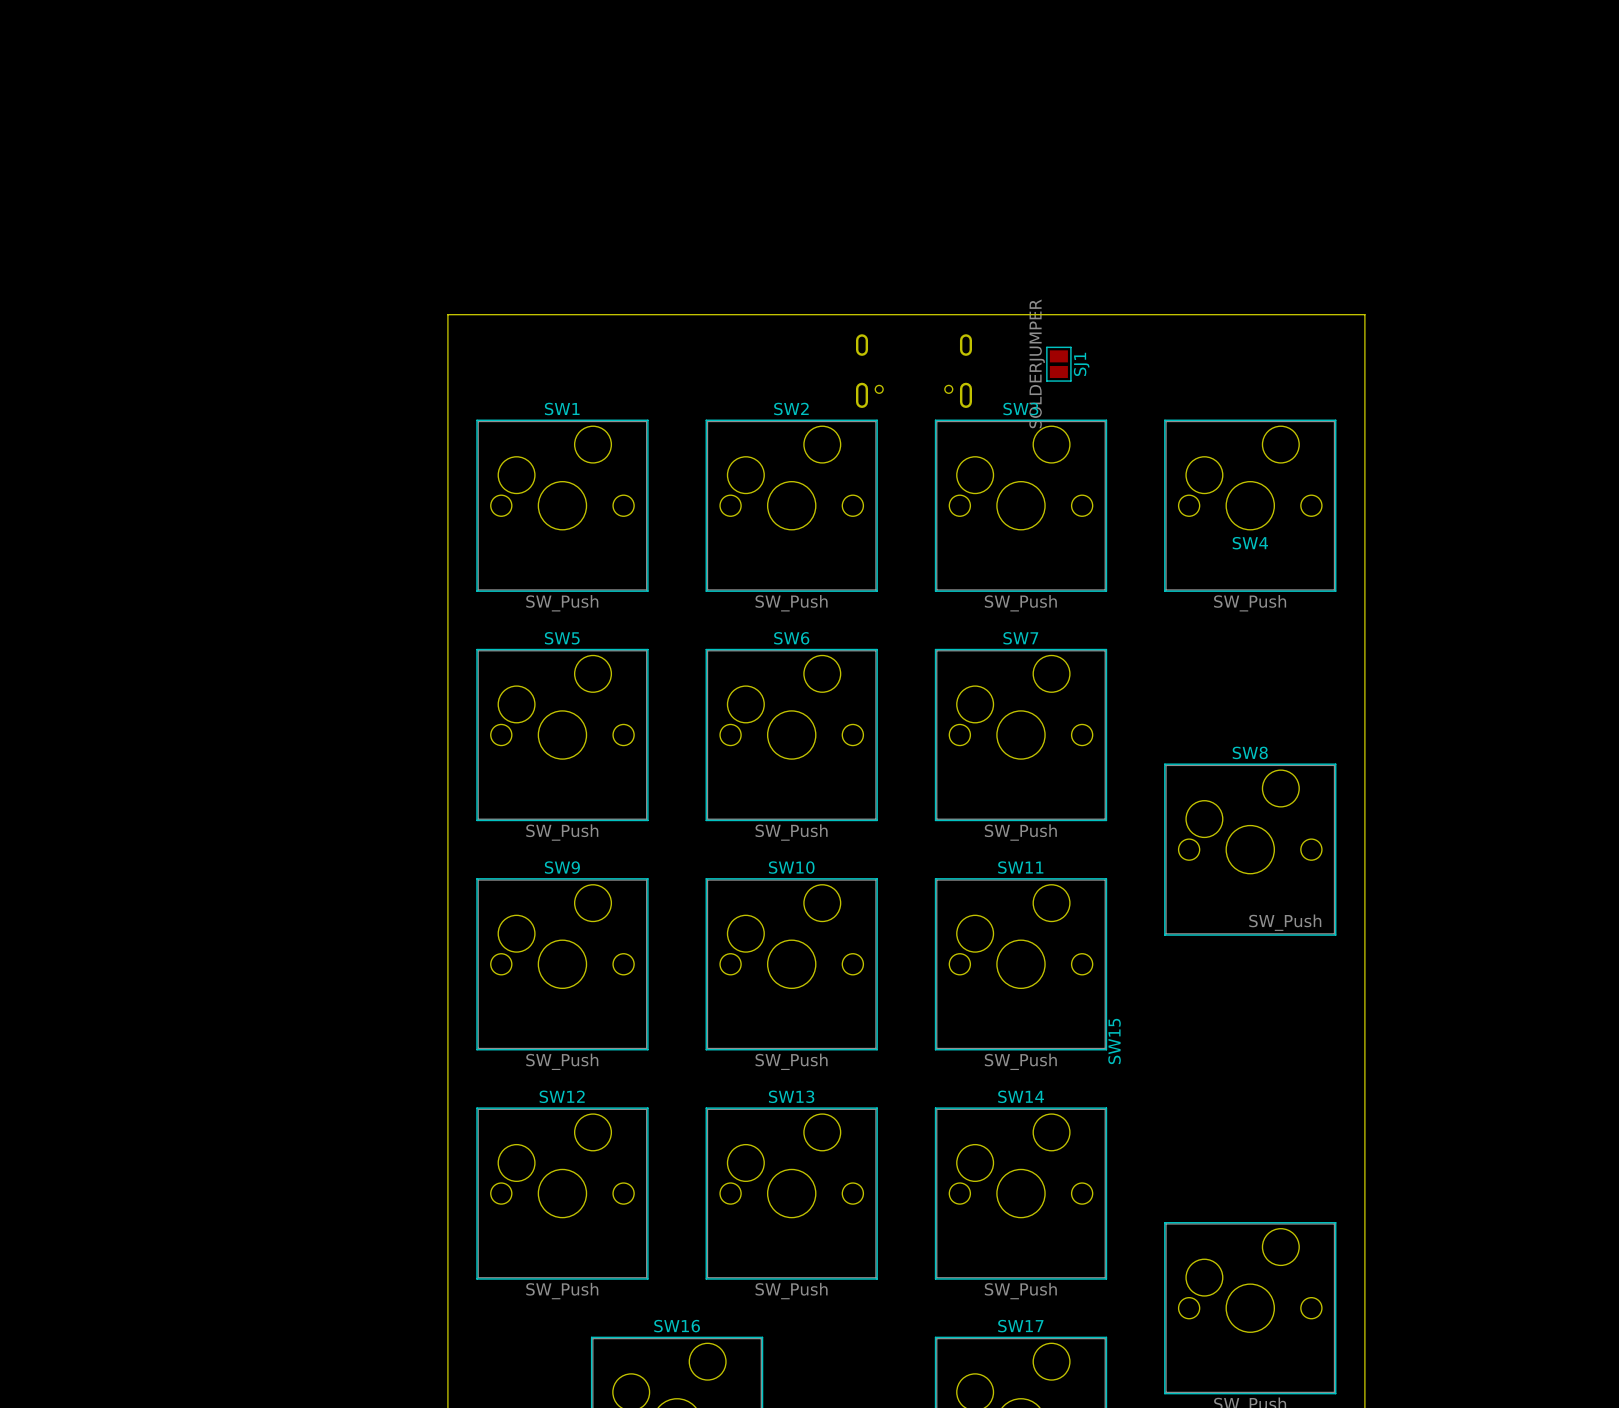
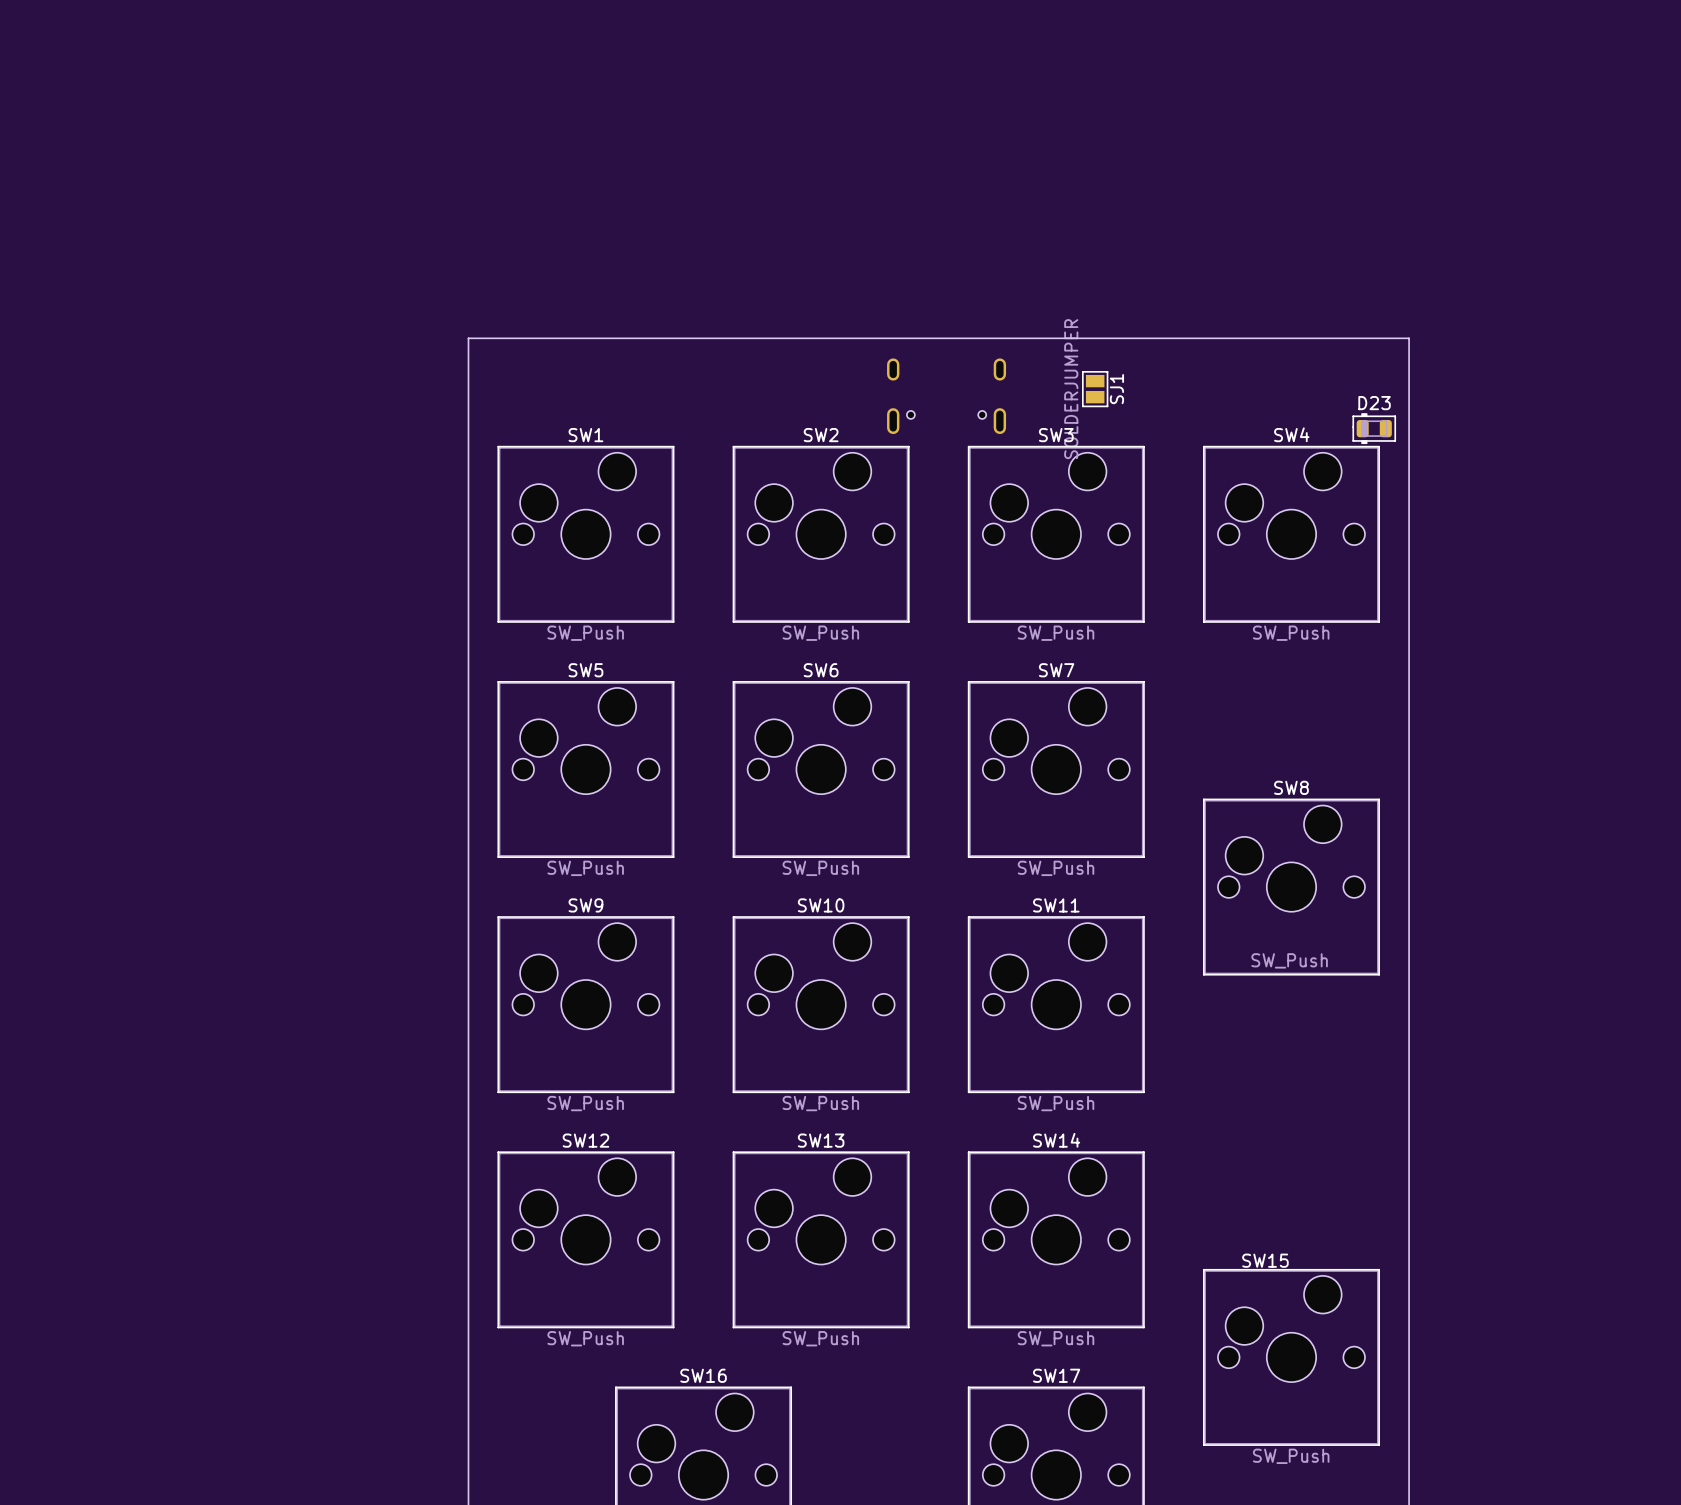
D23: none -> (1374, 428)
SW4 name position: SW4 (1250, 543) -> SW4 (1291, 434)
SW8 value position: SW_Push (1285, 922) -> SW_Push (1289, 960)
SW15 name rotation: 0° (1114, 1041) -> 90° clockwise (1265, 1260)
SW15 name position: SW15 (1114, 1041) -> SW15 (1265, 1260)

